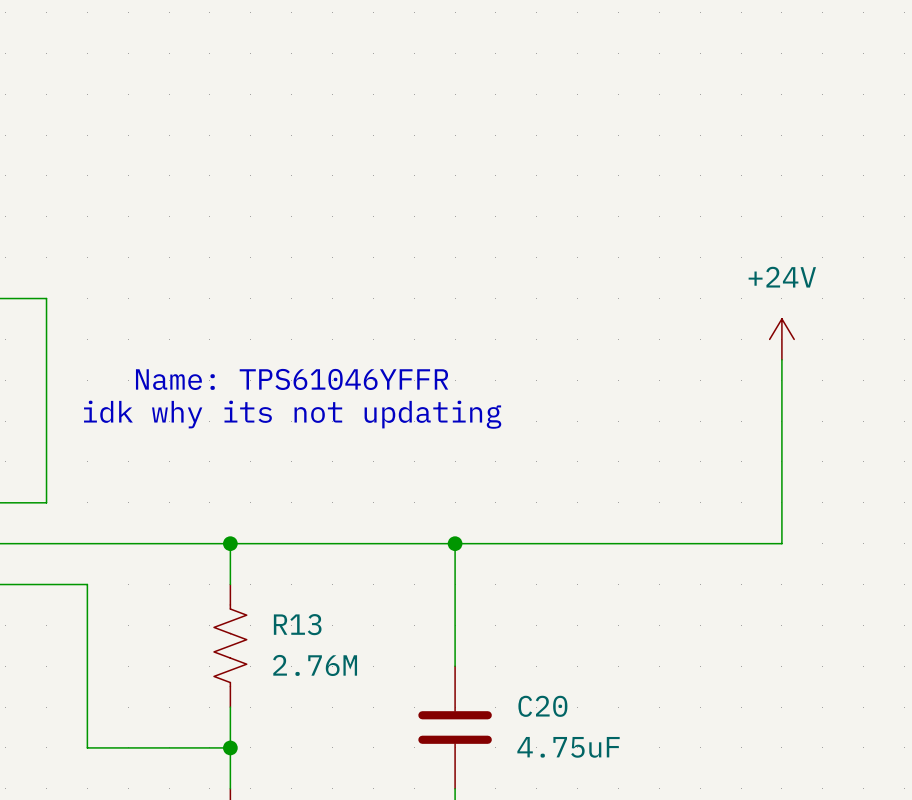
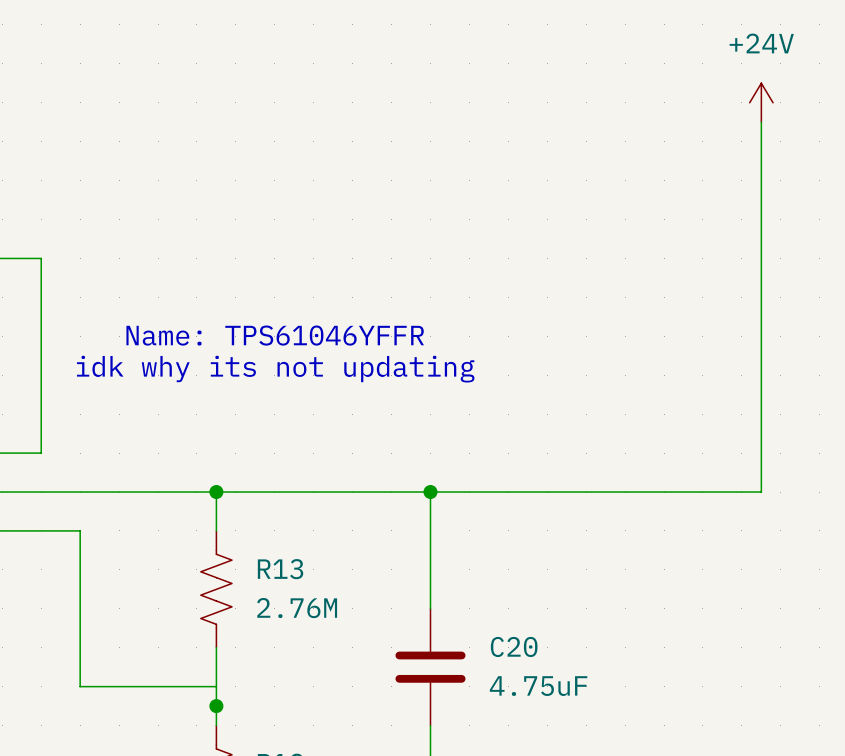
power symbol position: +24V (781, 339) -> +24V (761, 102)
wire: (781, 359) (781, 543) -> (761, 122) (761, 492) (741, 492)
junction position: (230, 747) -> (216, 706)

